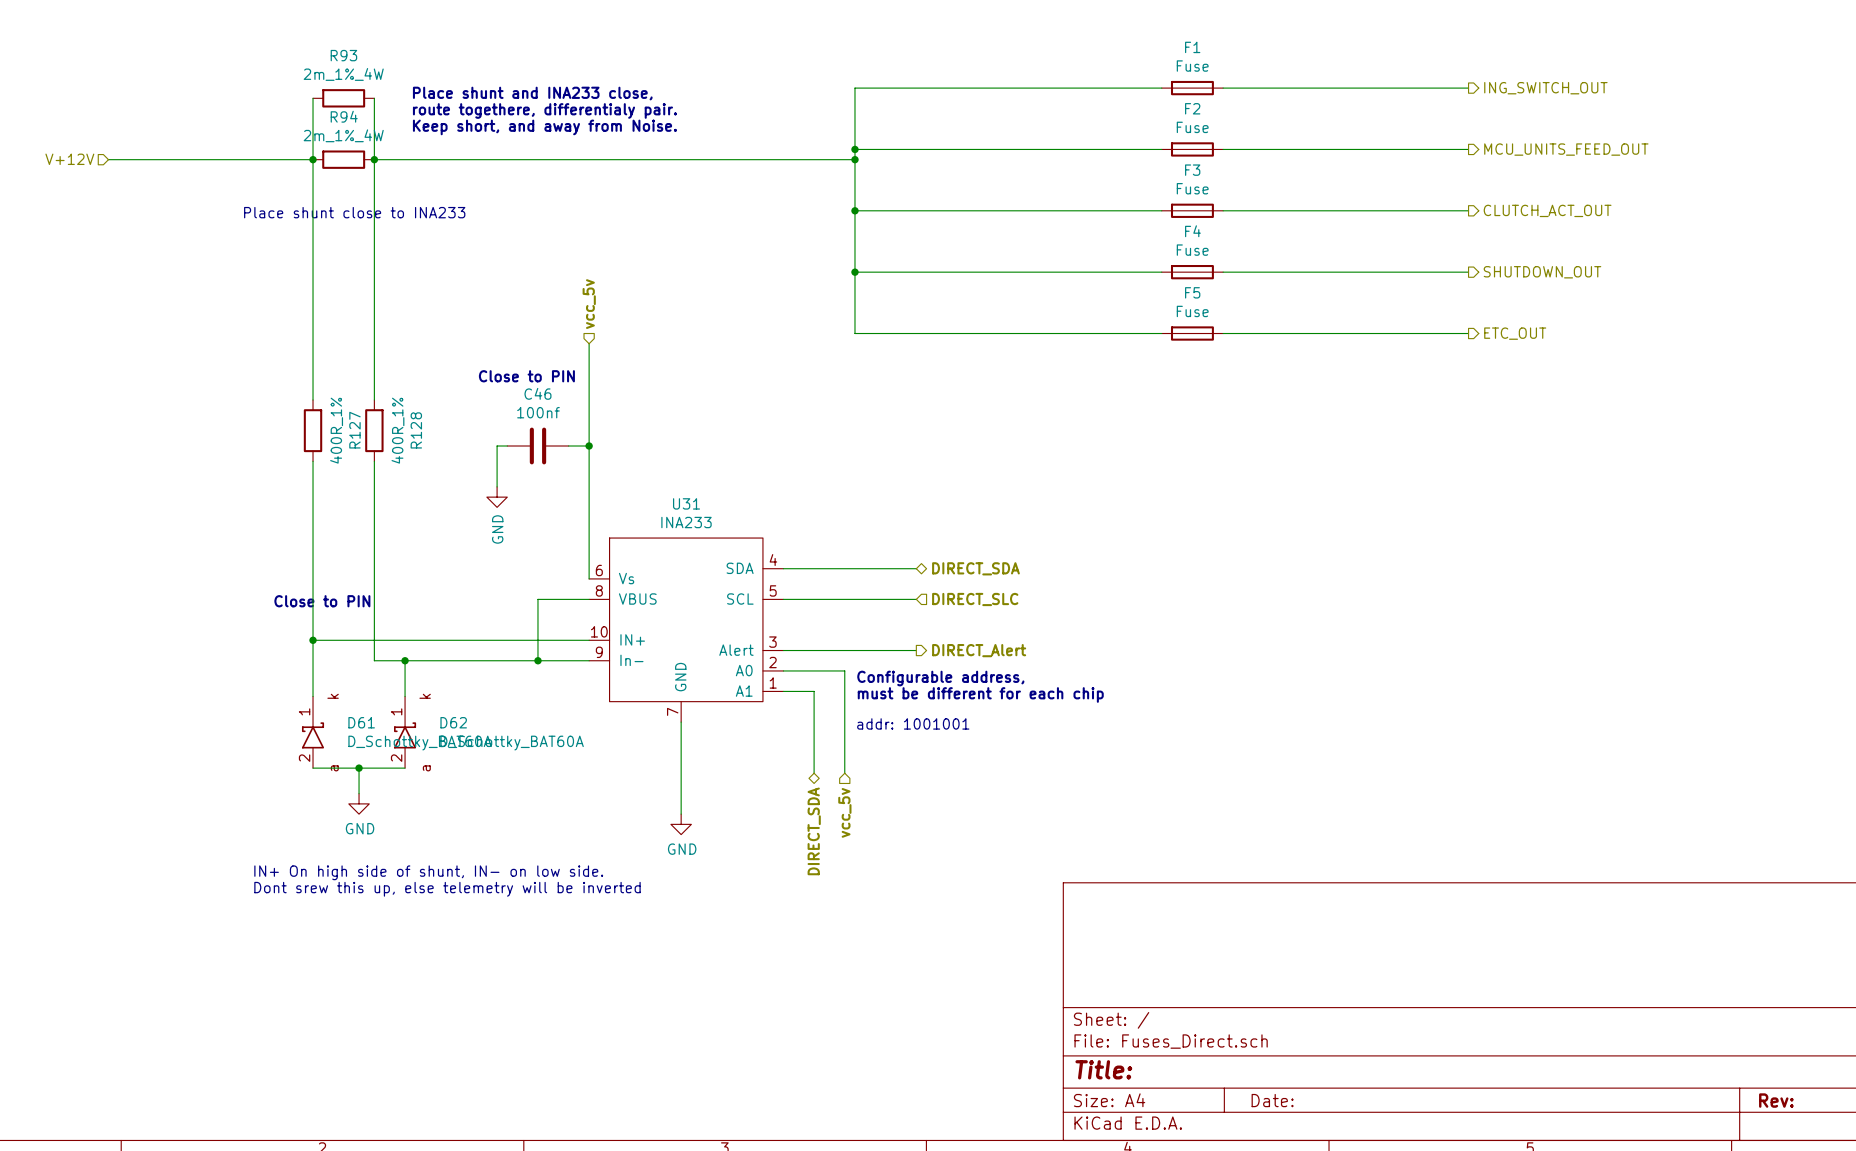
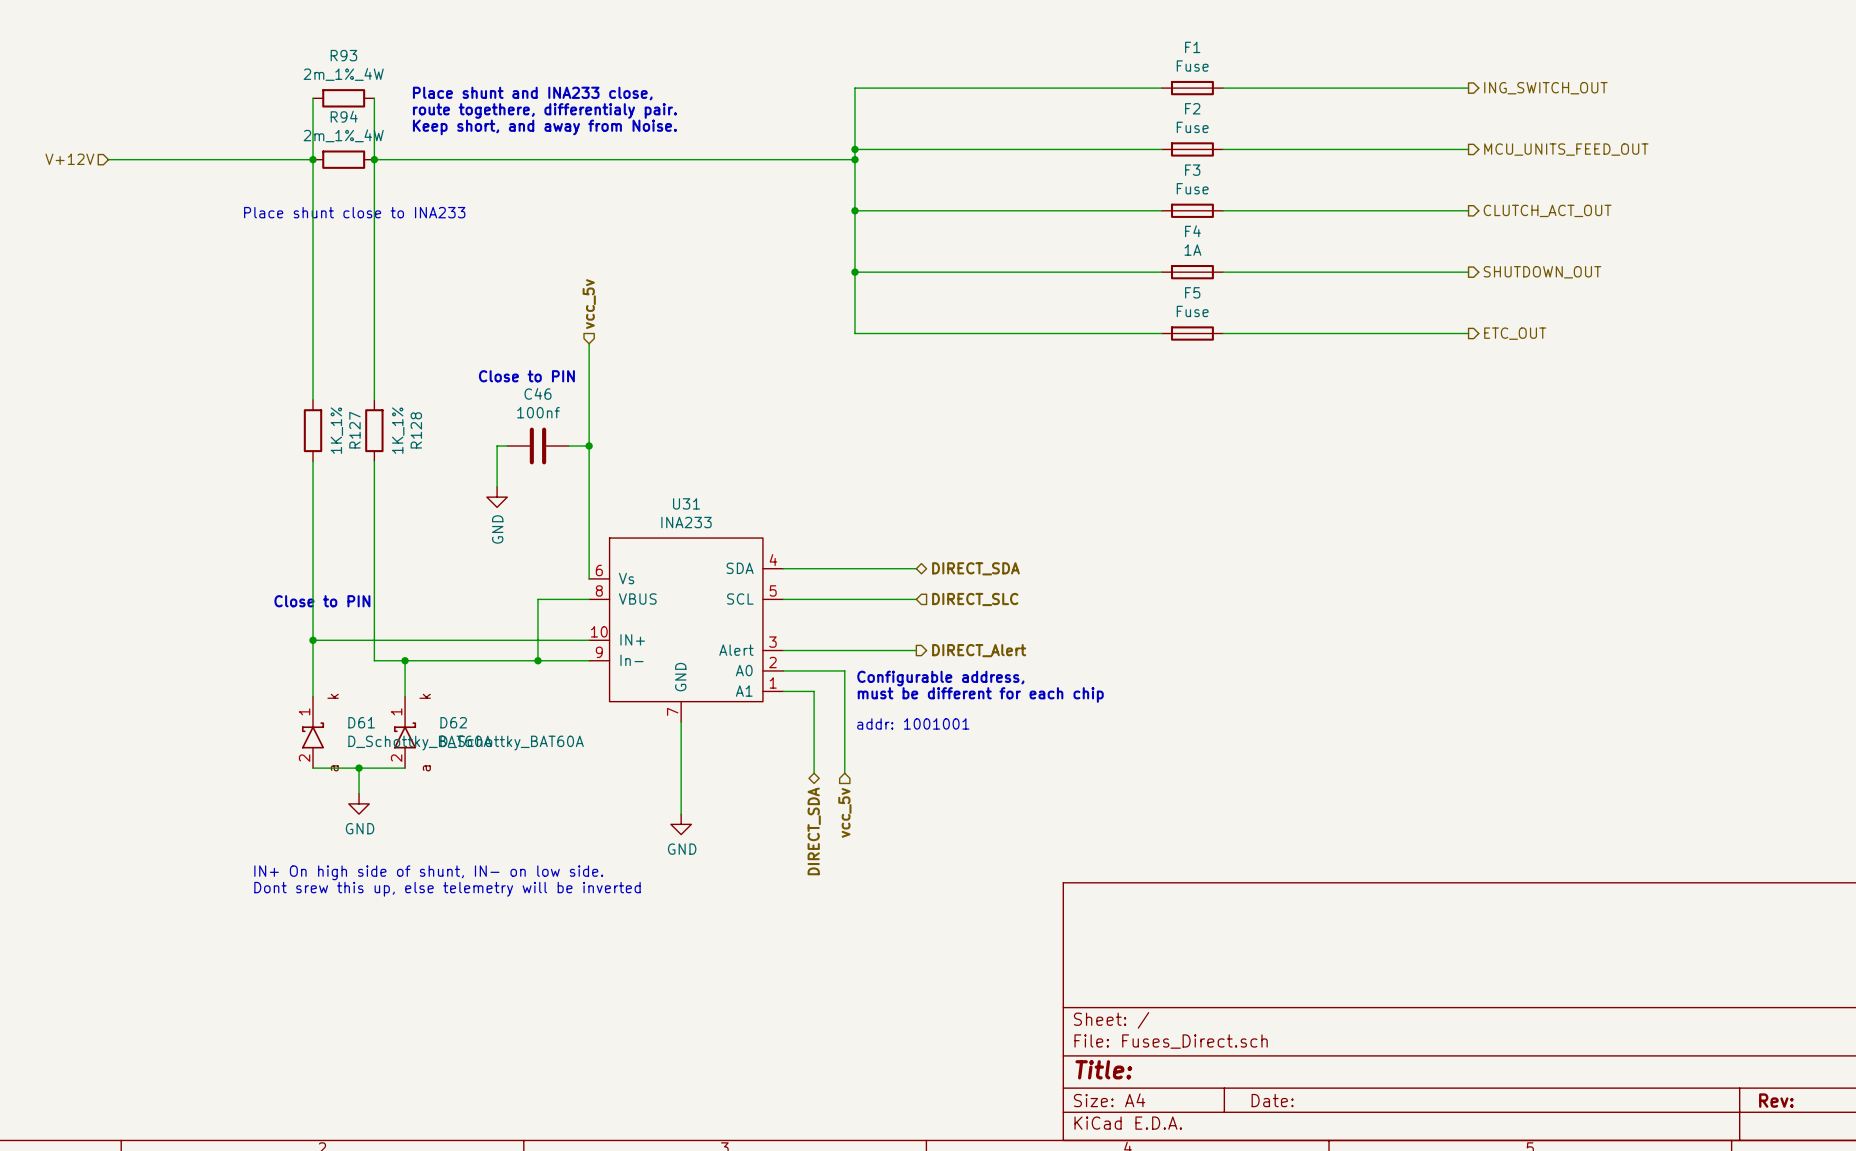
F4 value: Fuse (1192, 250) -> 1A (1192, 250)
R127 value: 400R_1% (336, 430) -> 1K_1% (336, 430)
R128 value: 400R_1% (397, 430) -> 1K_1% (398, 430)

